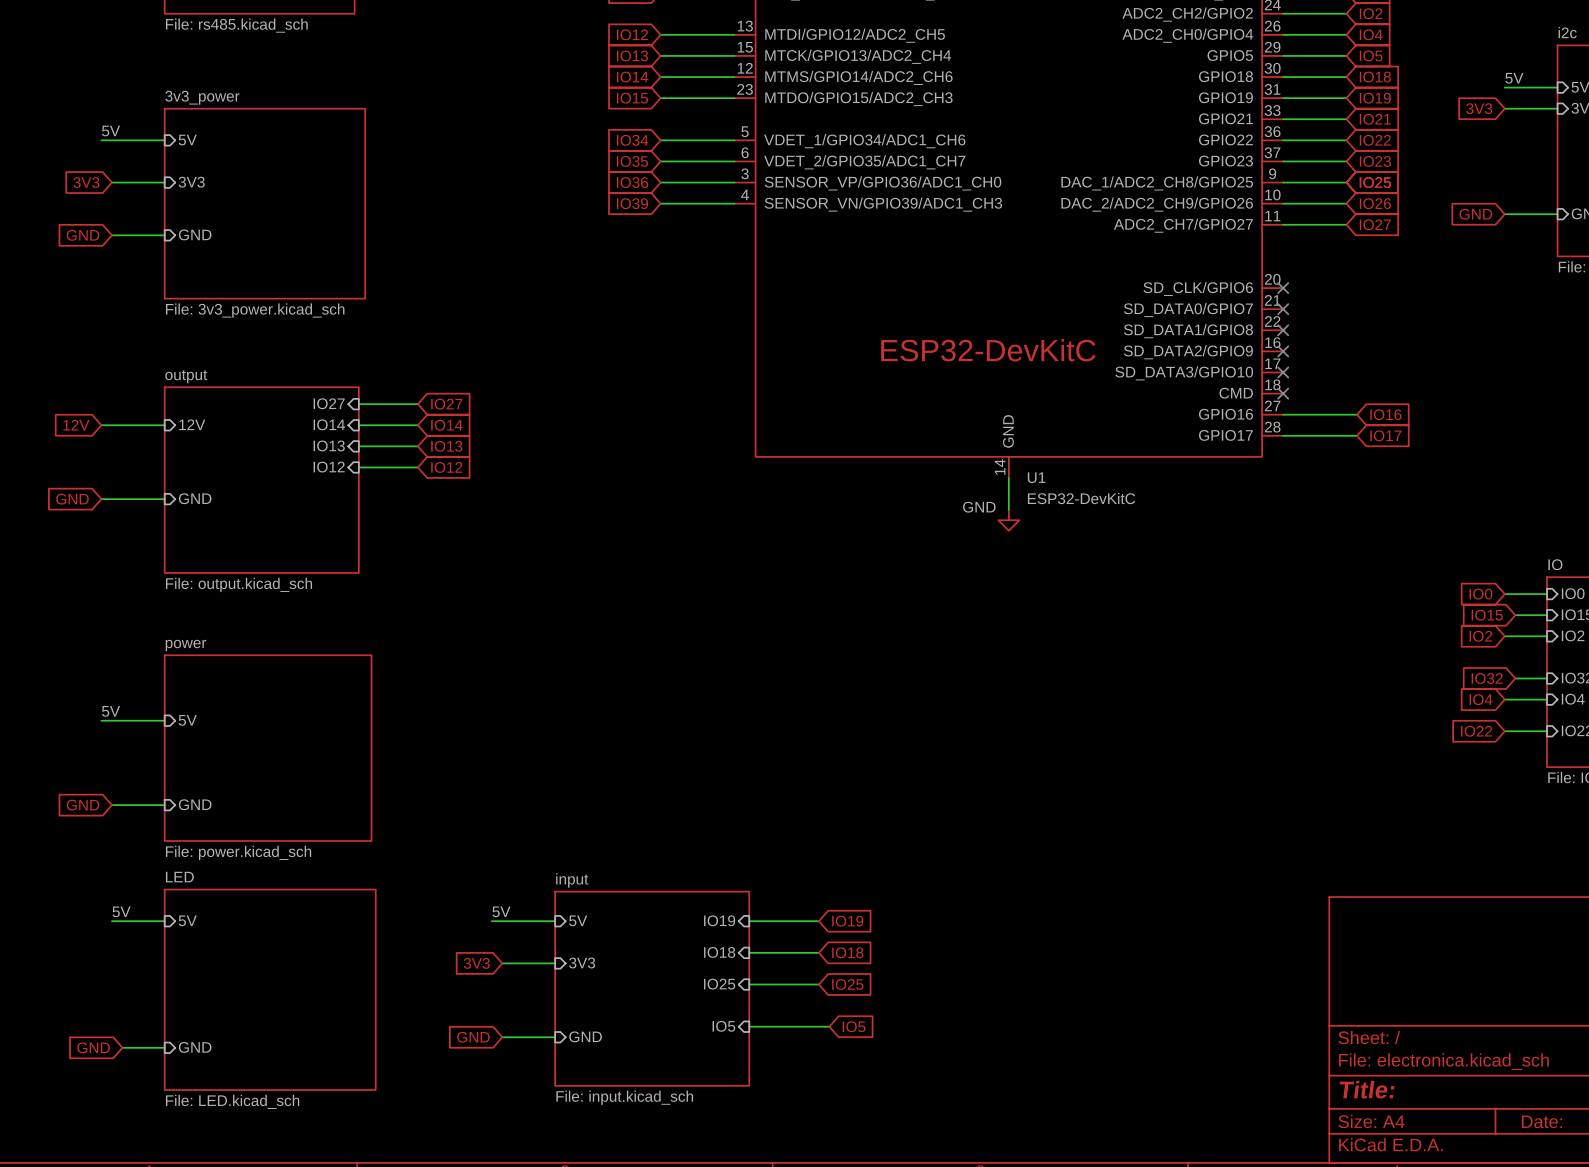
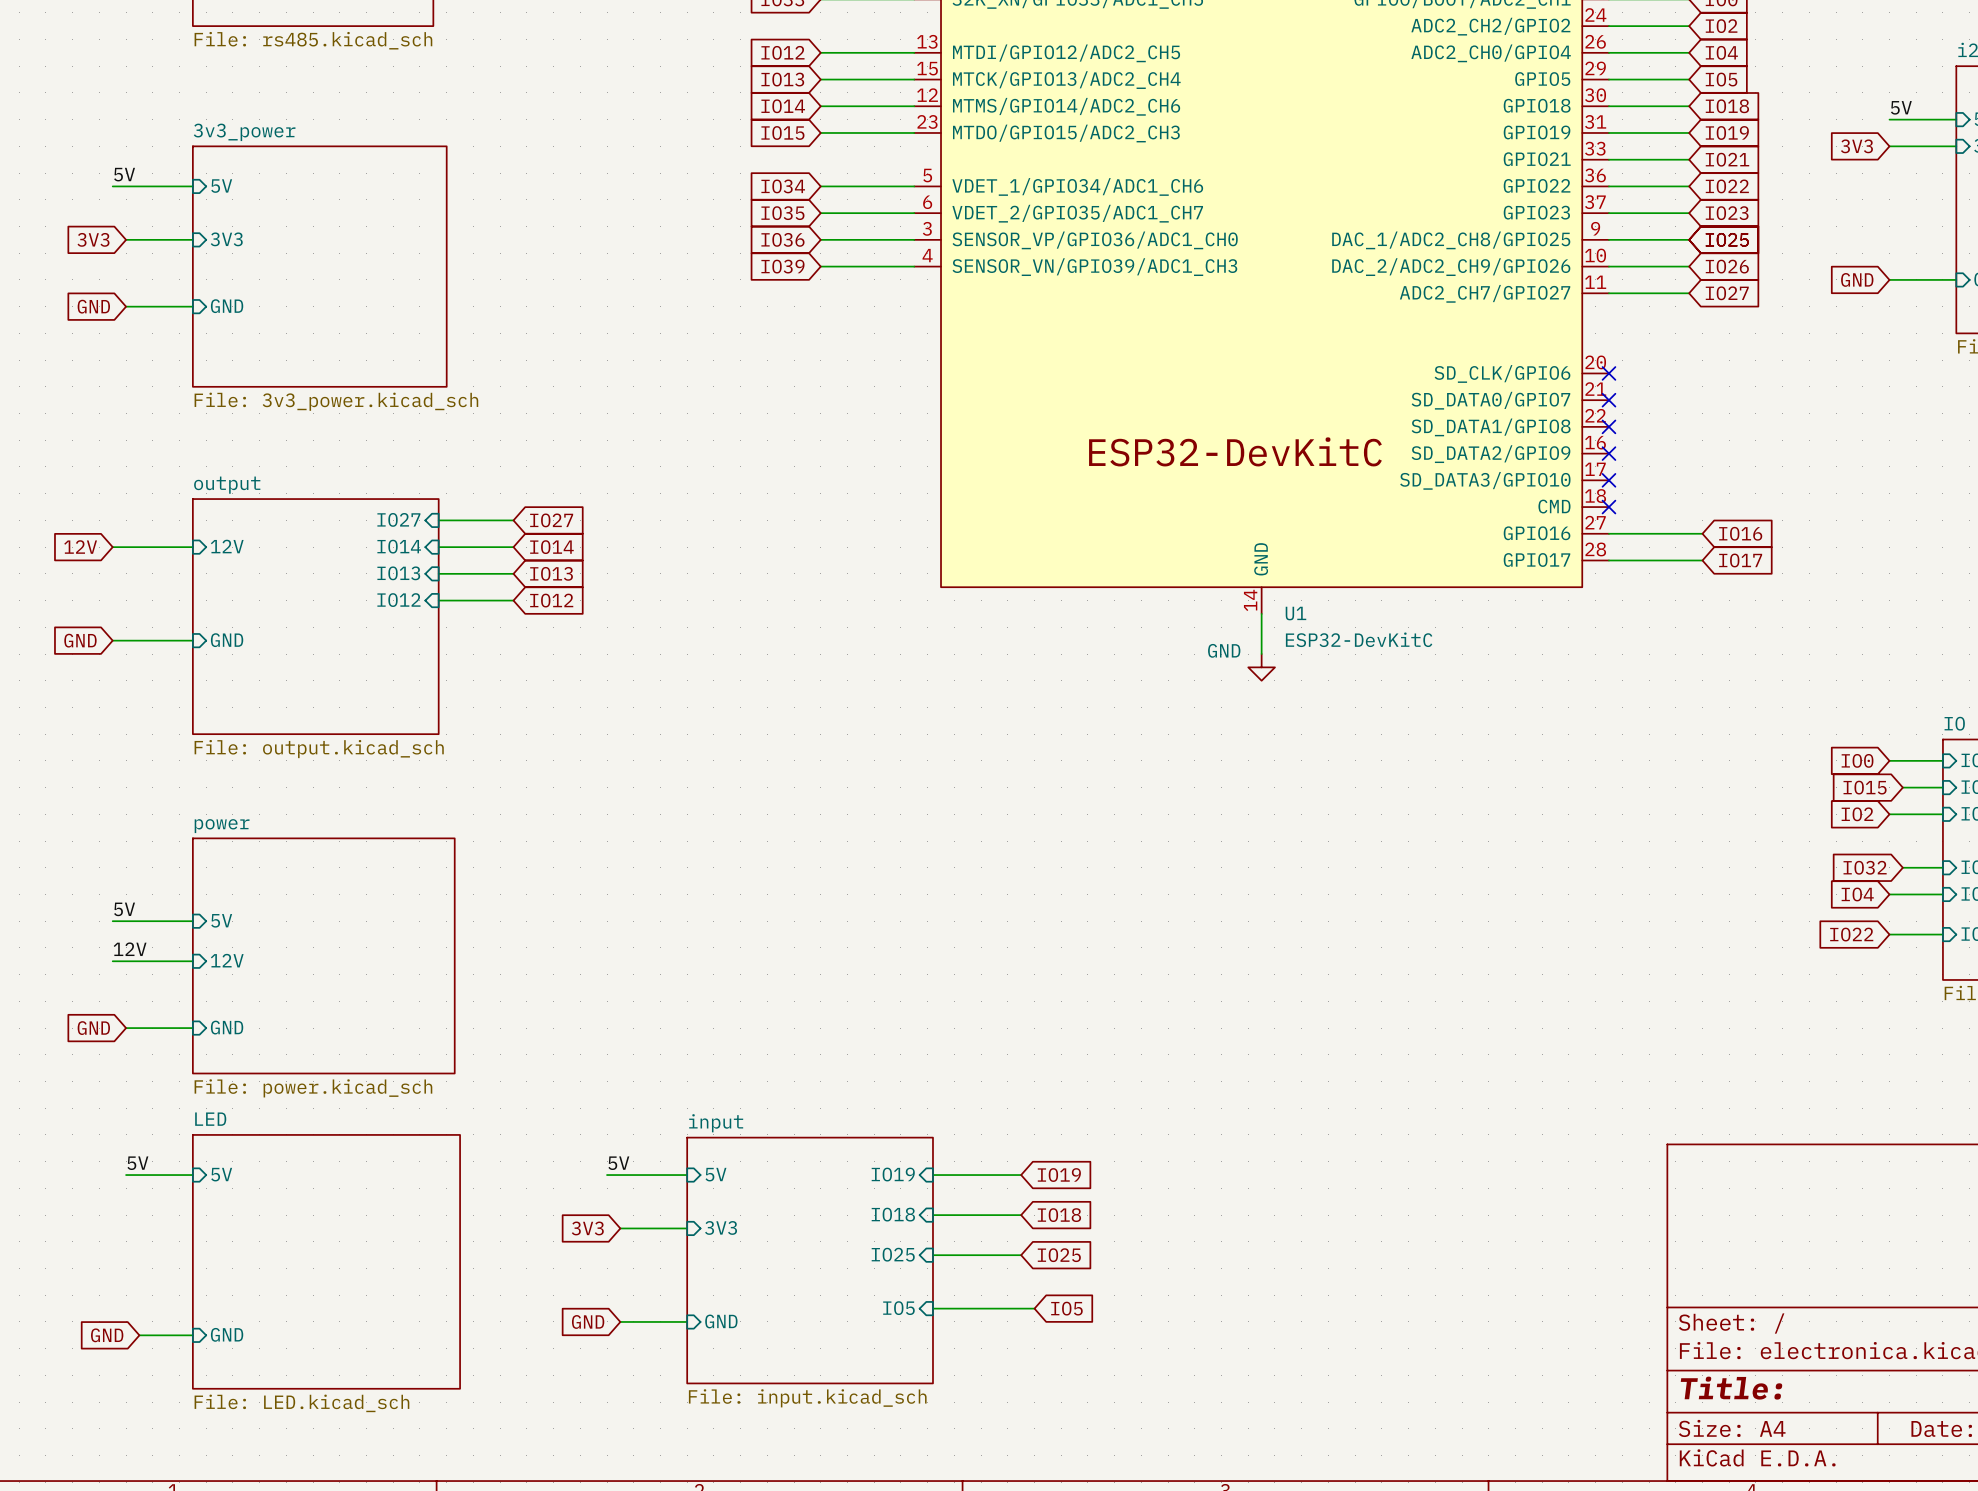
label: none -> 12V (130, 949)
sheet pin: none -> 12V (227, 960)
wire: none -> (112, 961) (192, 961)

